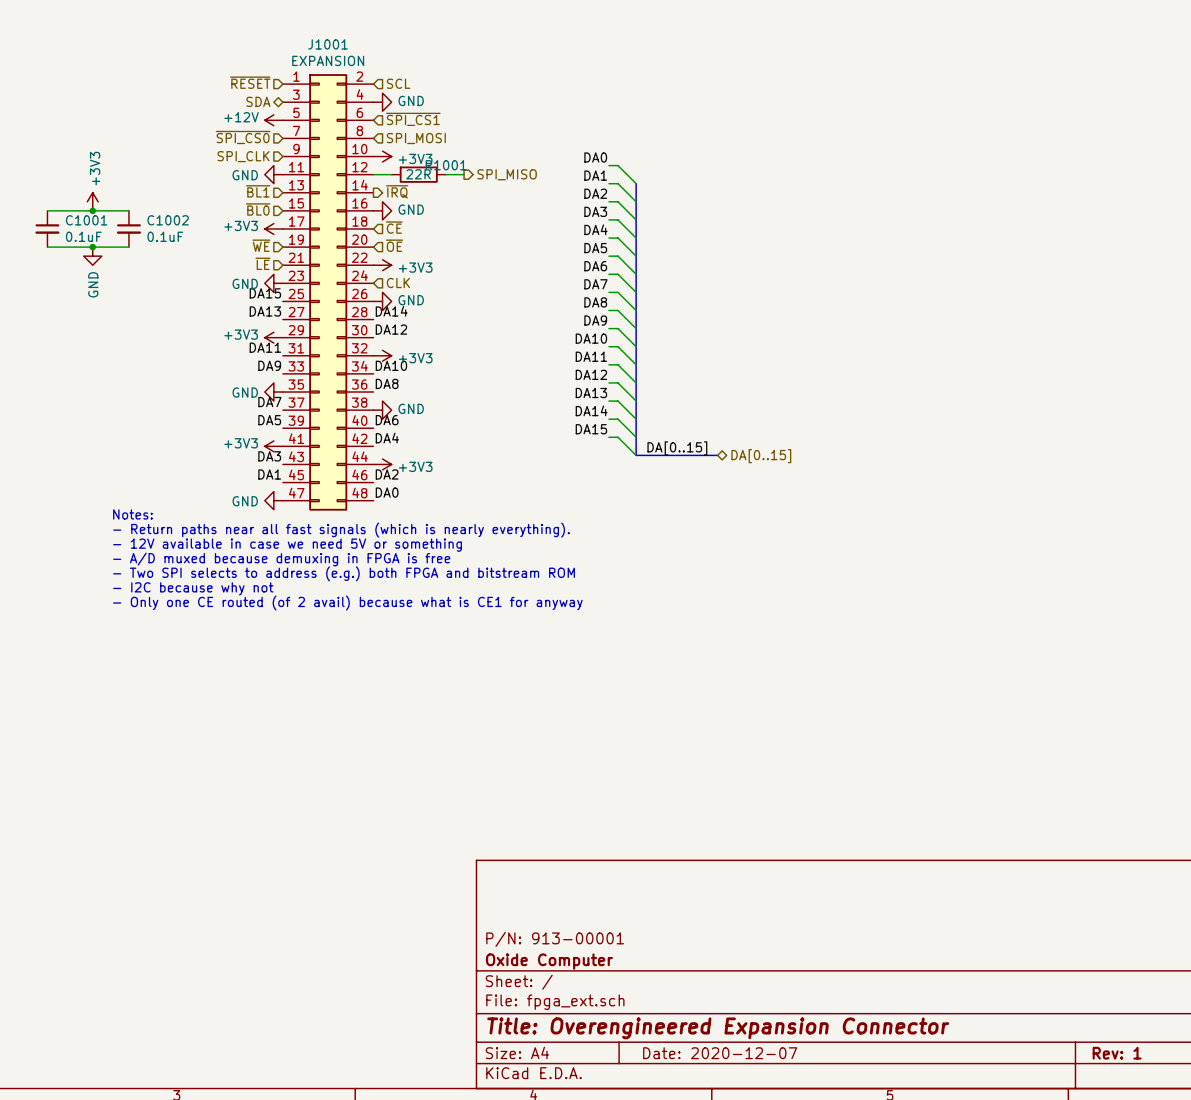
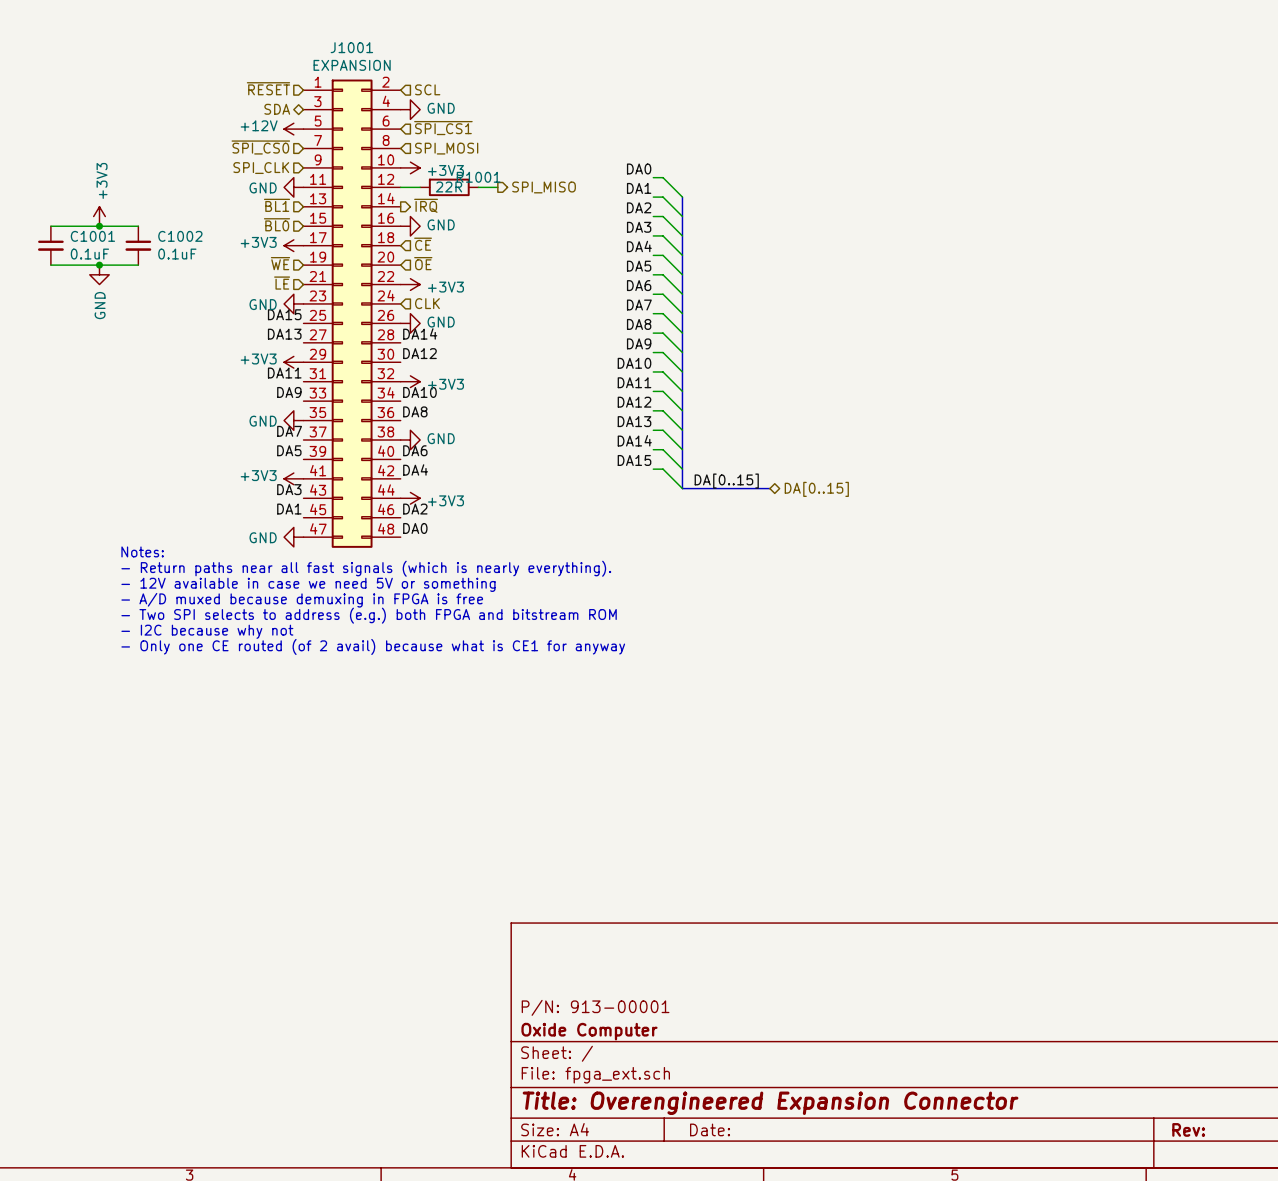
title block: Date: 2020-12-07 (720, 1053) -> Date: (710, 1129)
title block: Rev: 1 (1117, 1053) -> Rev: (1188, 1129)

